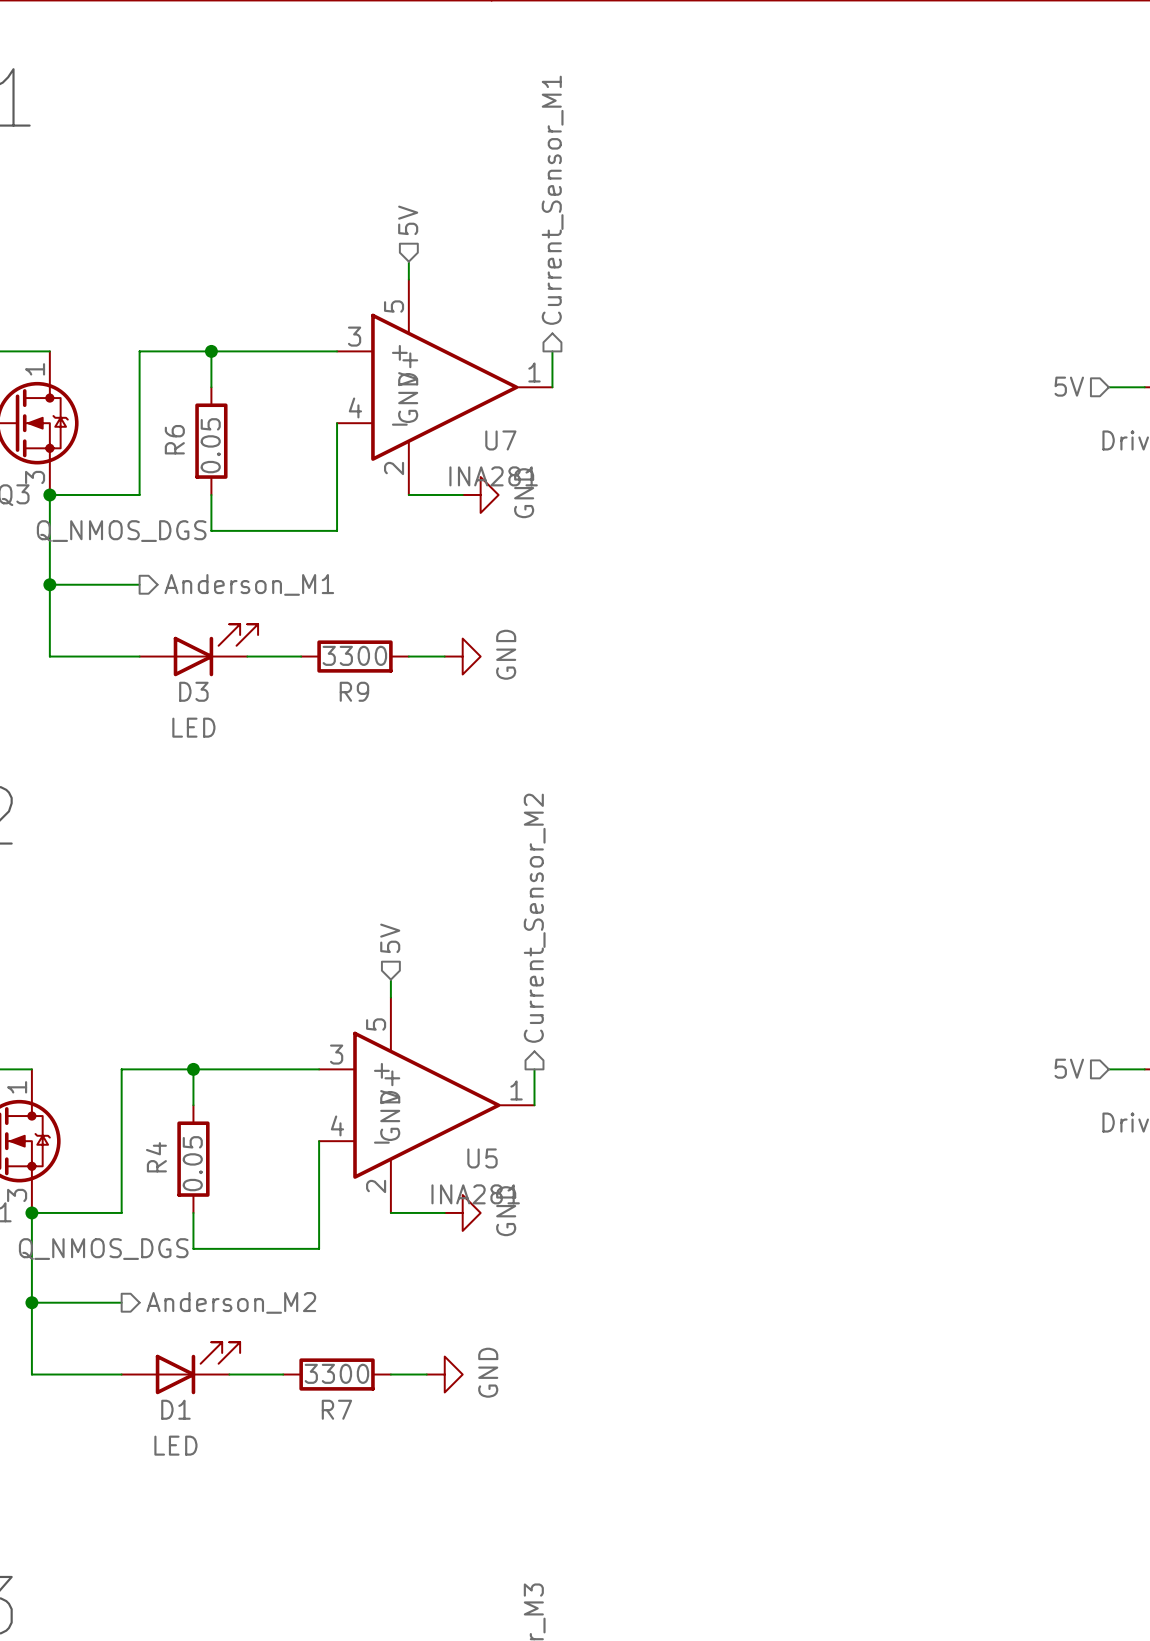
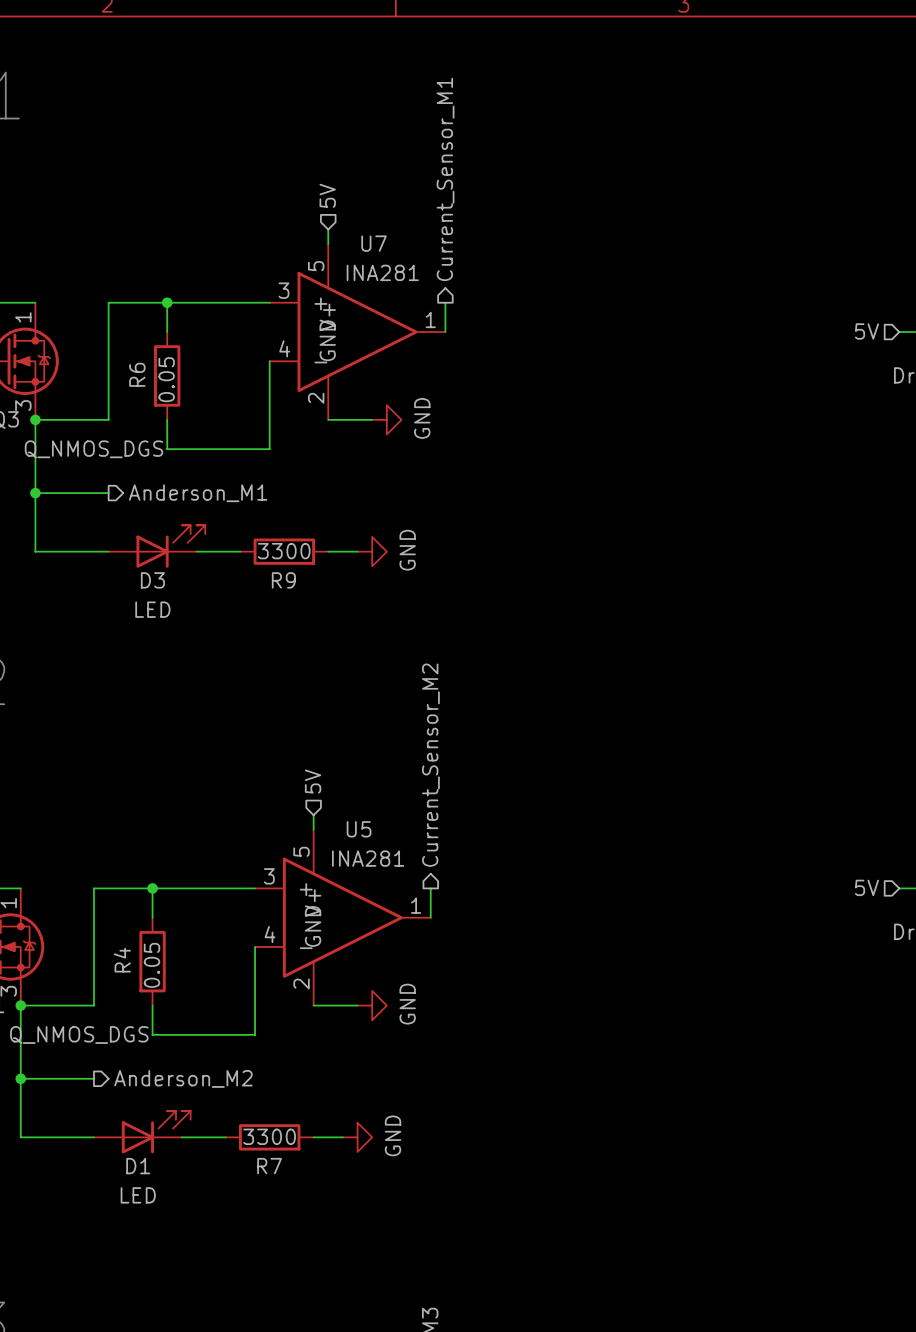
U7 name position: U7 (500, 440) -> U7 (374, 243)
U7 value position: INA281 (493, 476) -> INA281 (382, 272)
U5 name position: U5 (482, 1158) -> U5 (359, 829)
U5 value position: INA281 (475, 1194) -> INA281 (368, 858)

